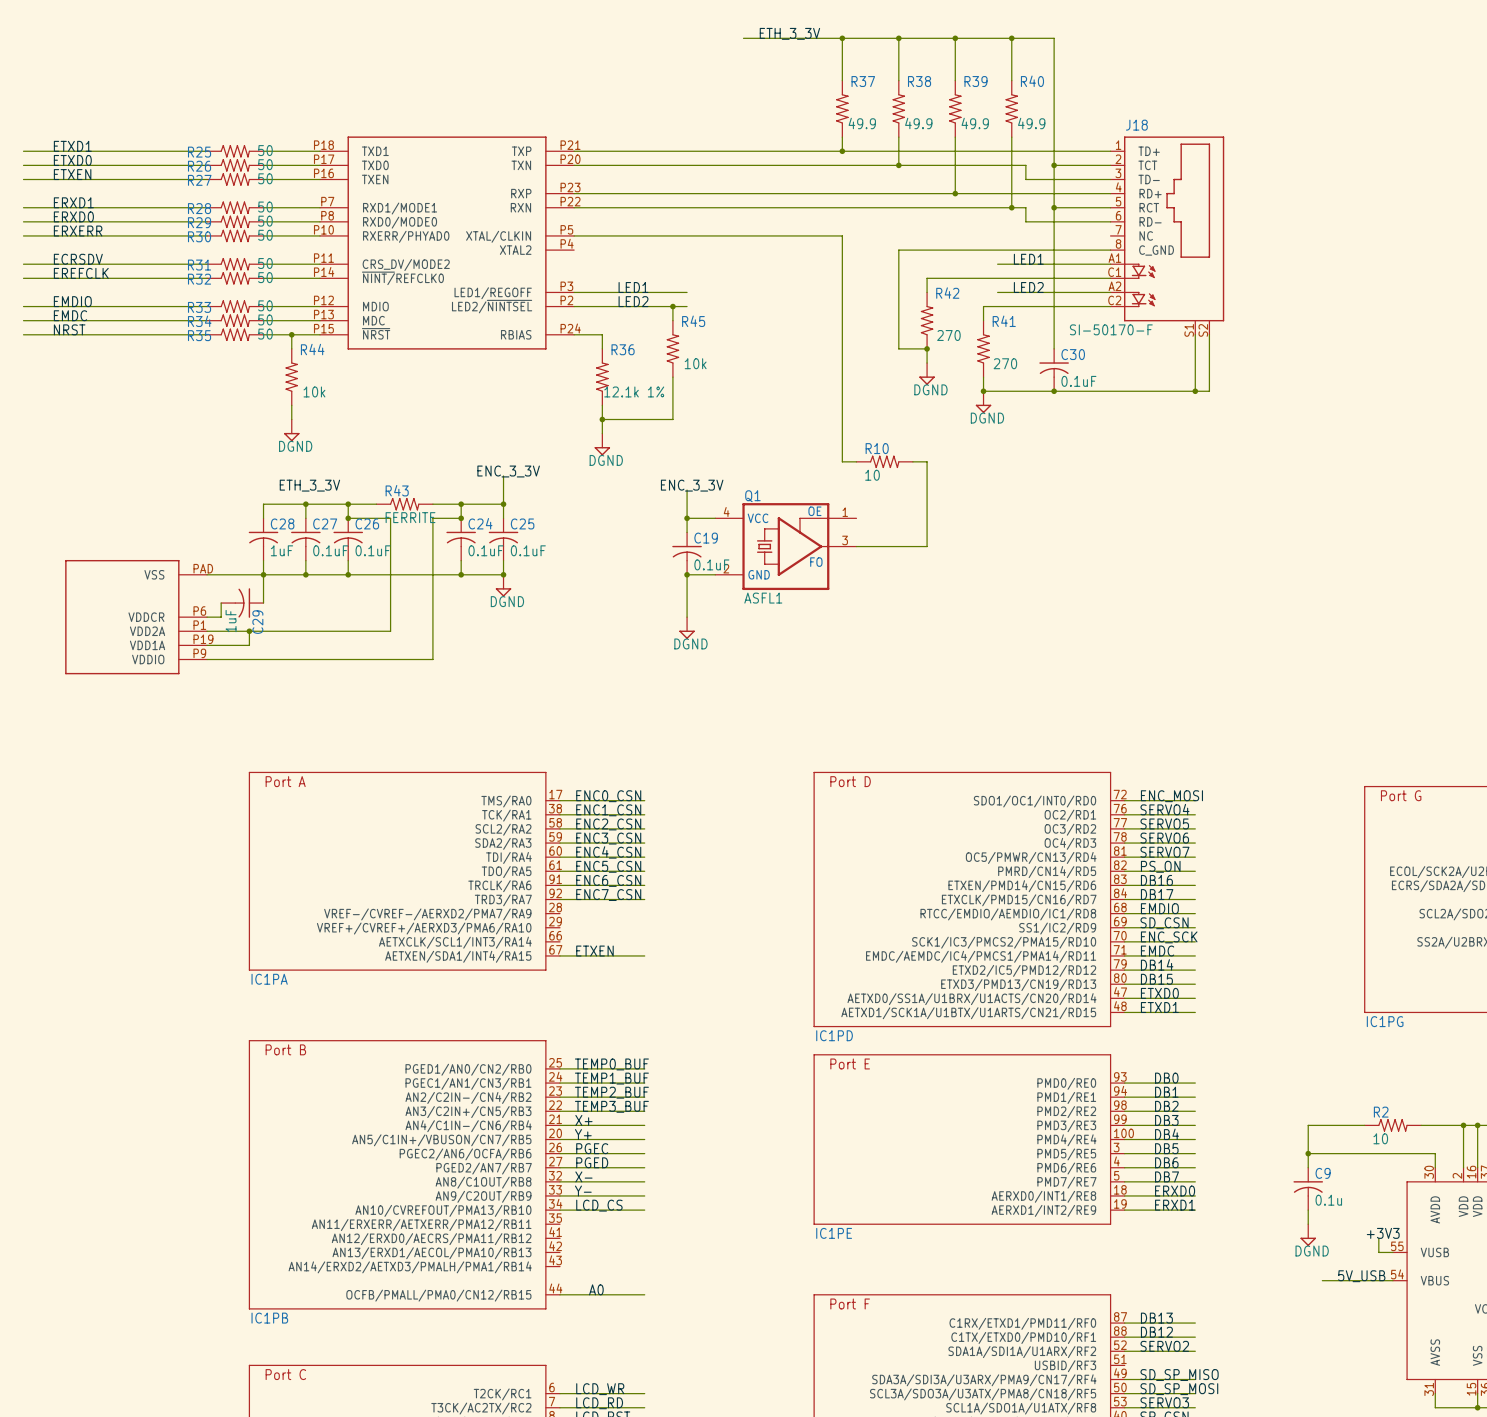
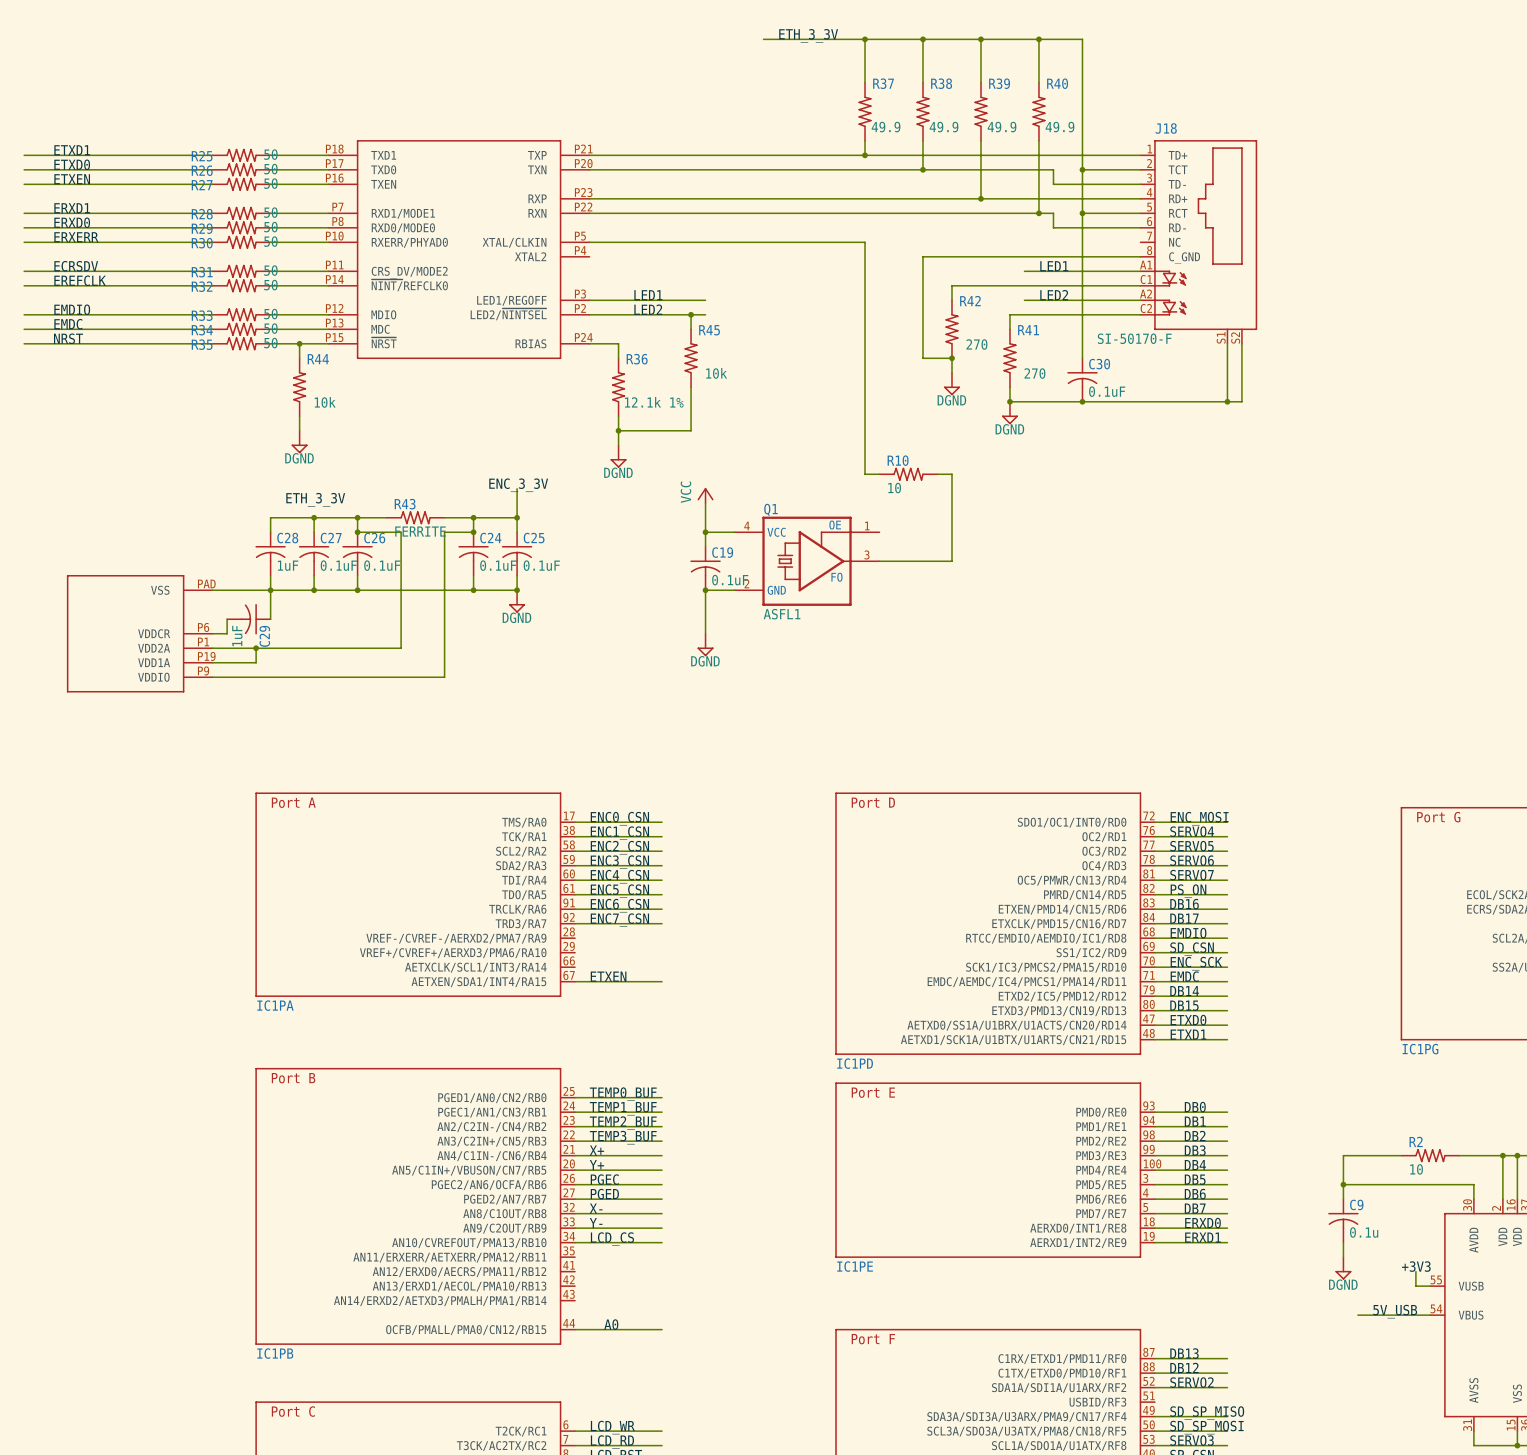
power symbol: none -> VCC (705, 495)
label: ENC_3_3V (692, 485) -> none

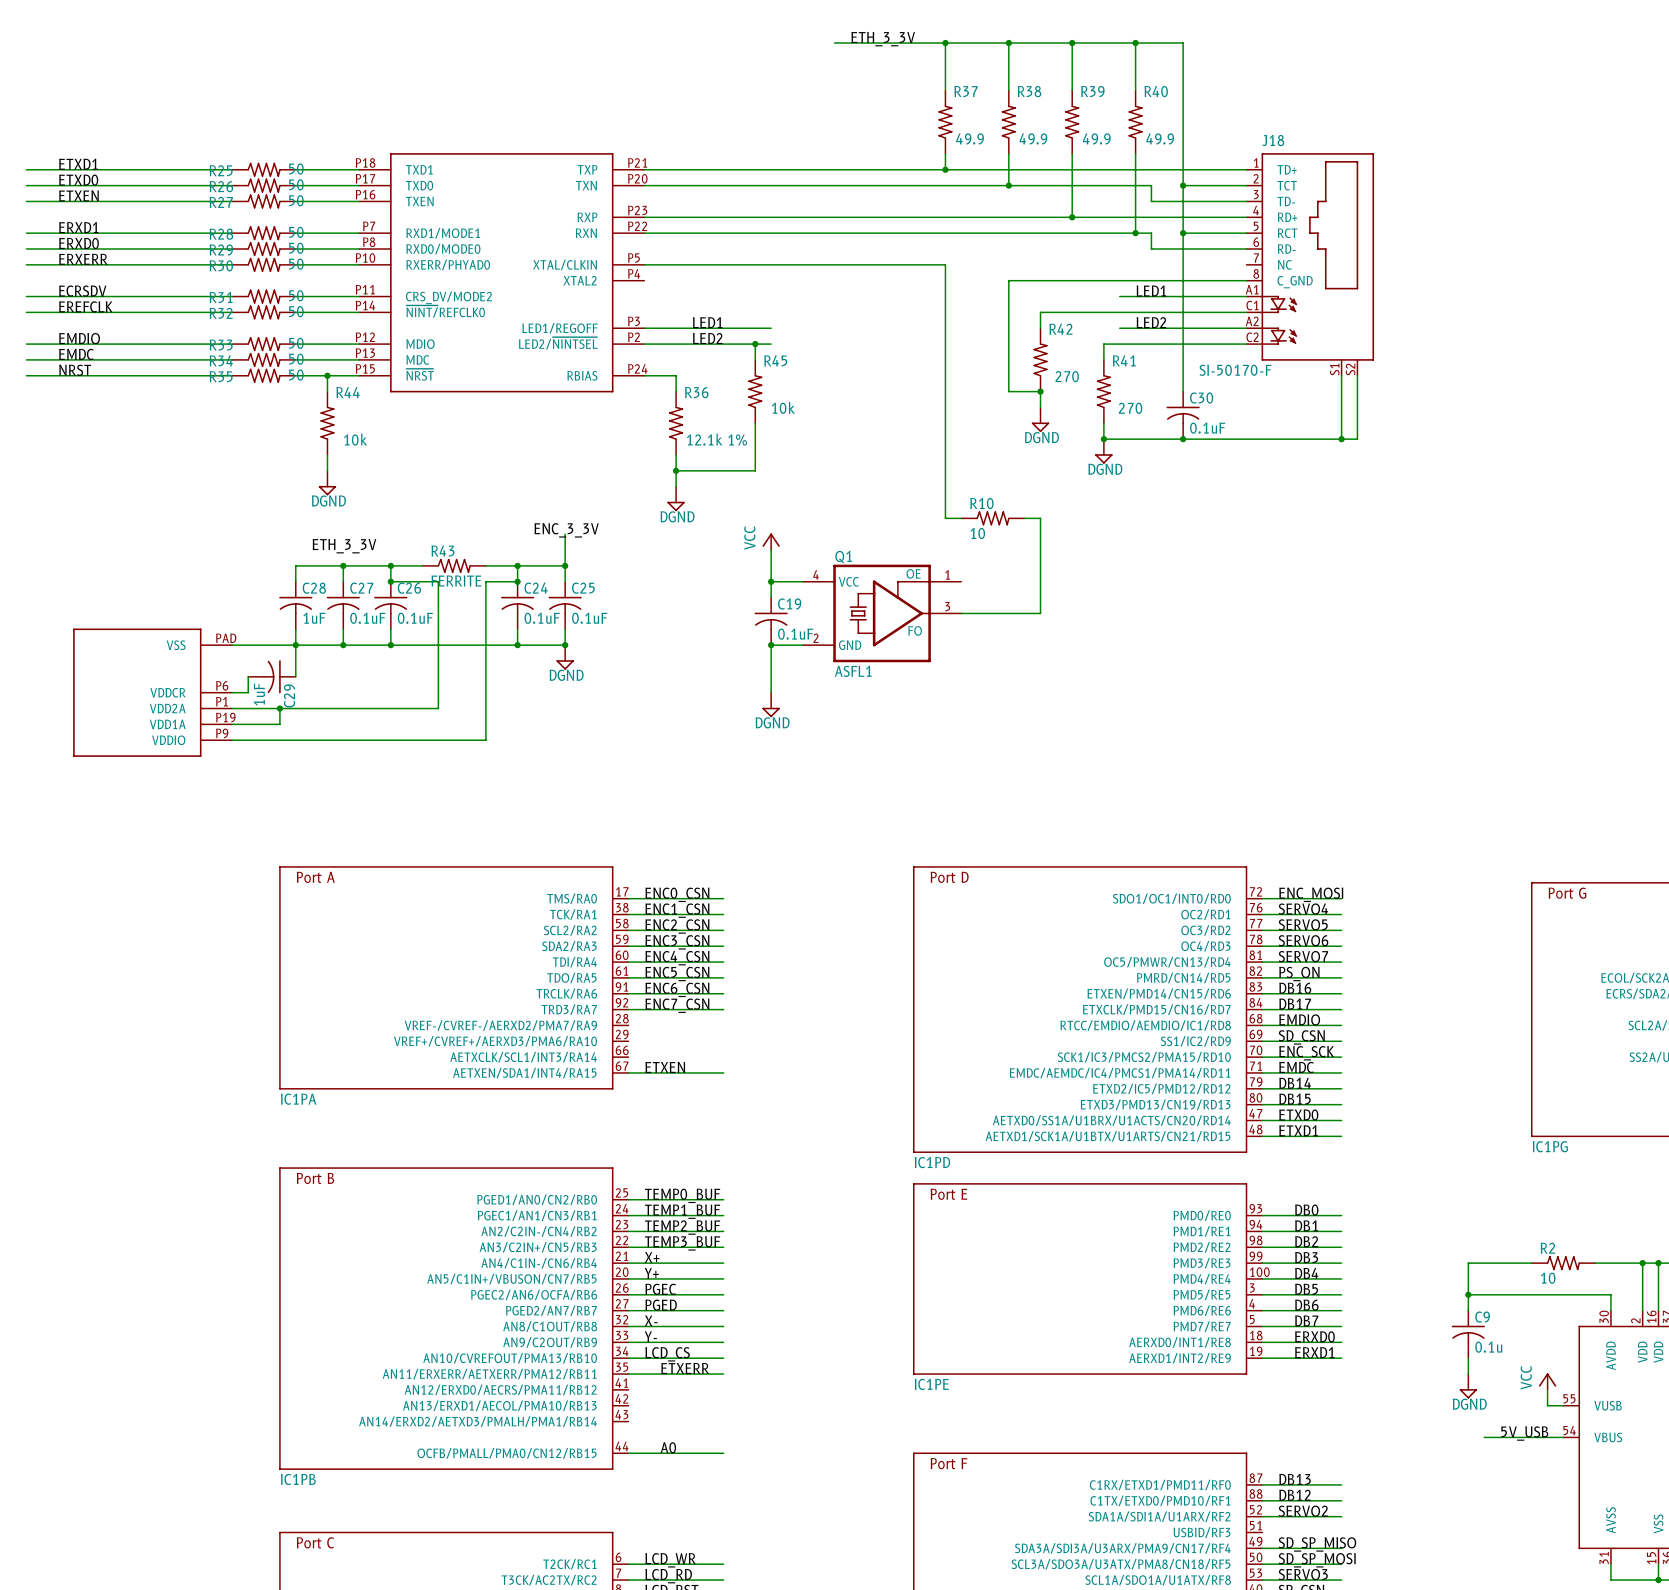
label: none -> ETXERR (685, 1368)
wire: none -> (628, 1374) (723, 1374)
power symbol: none -> VCC (1547, 1381)
label: +3V3 (1416, 1266) -> none

